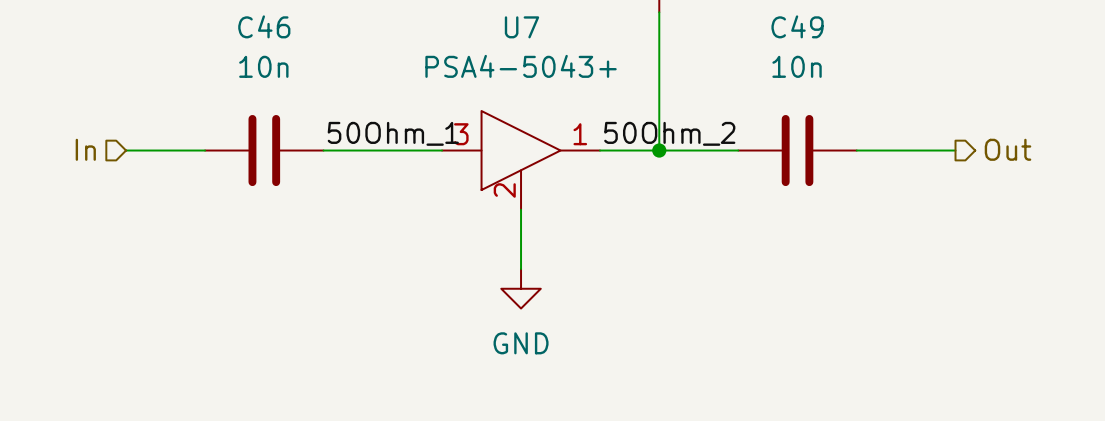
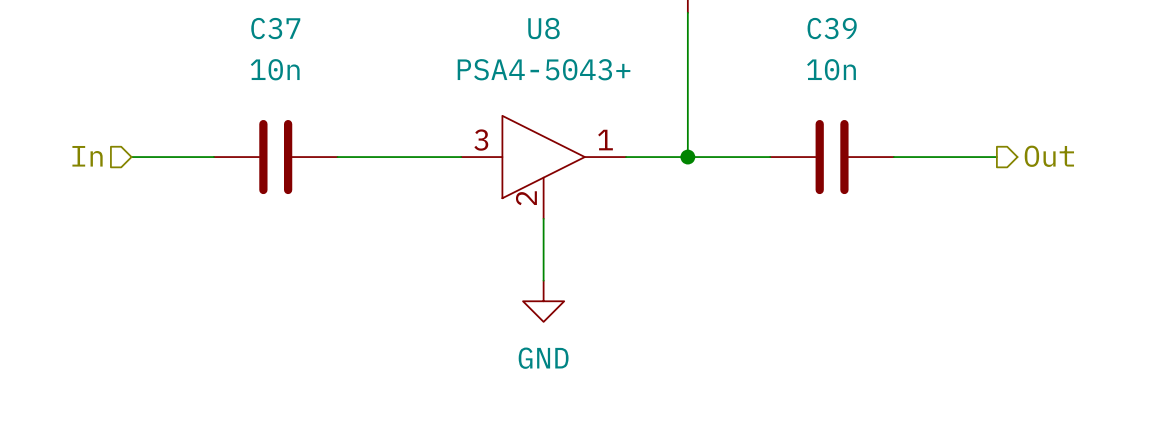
C46 name: C46 (264, 26) -> C37 (275, 28)
C49 name: C49 (797, 26) -> C39 (832, 28)
U7 name: U7 (521, 27) -> U8 (543, 28)
label: 50Ohm_1 (393, 133) -> none
label: 50Ohm_2 (669, 133) -> none

